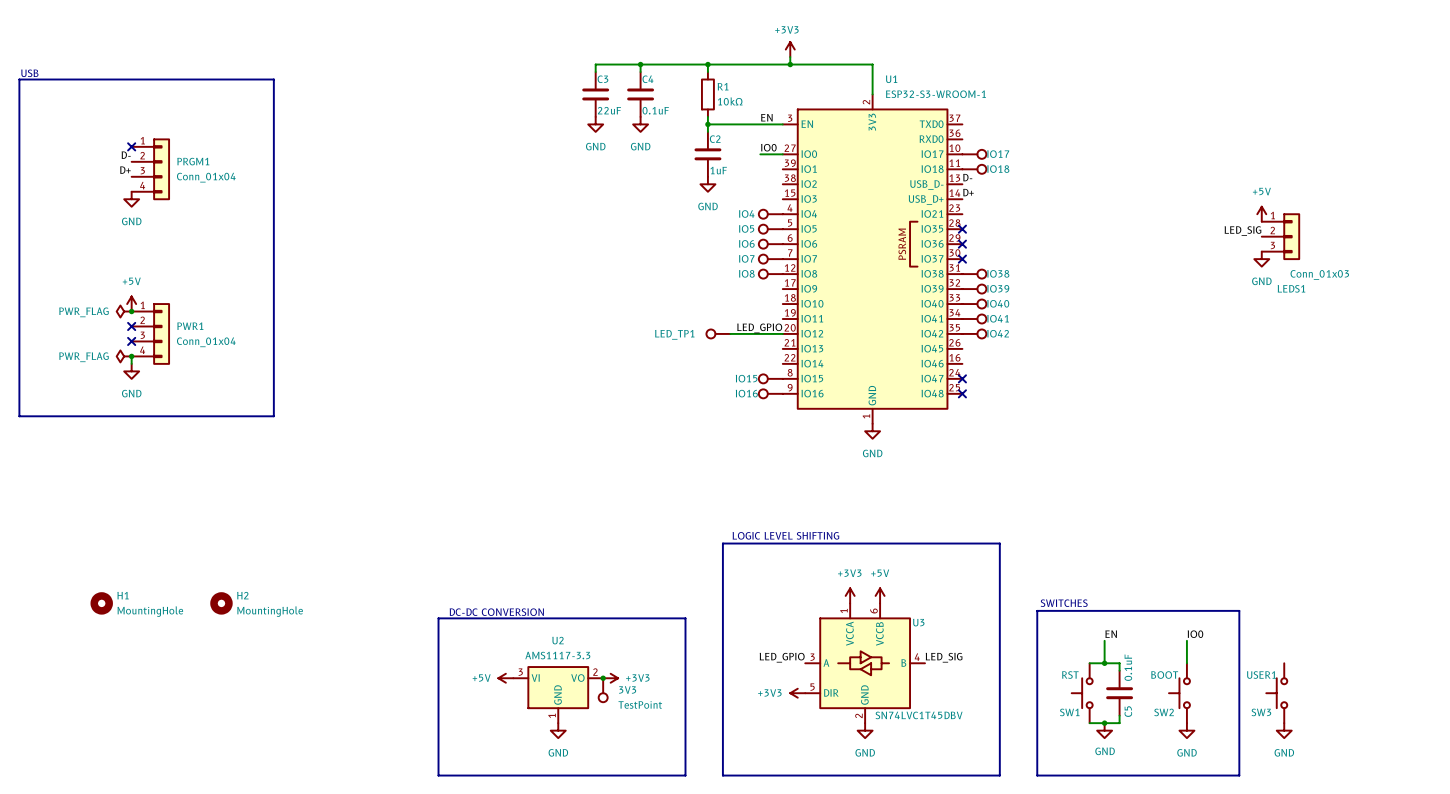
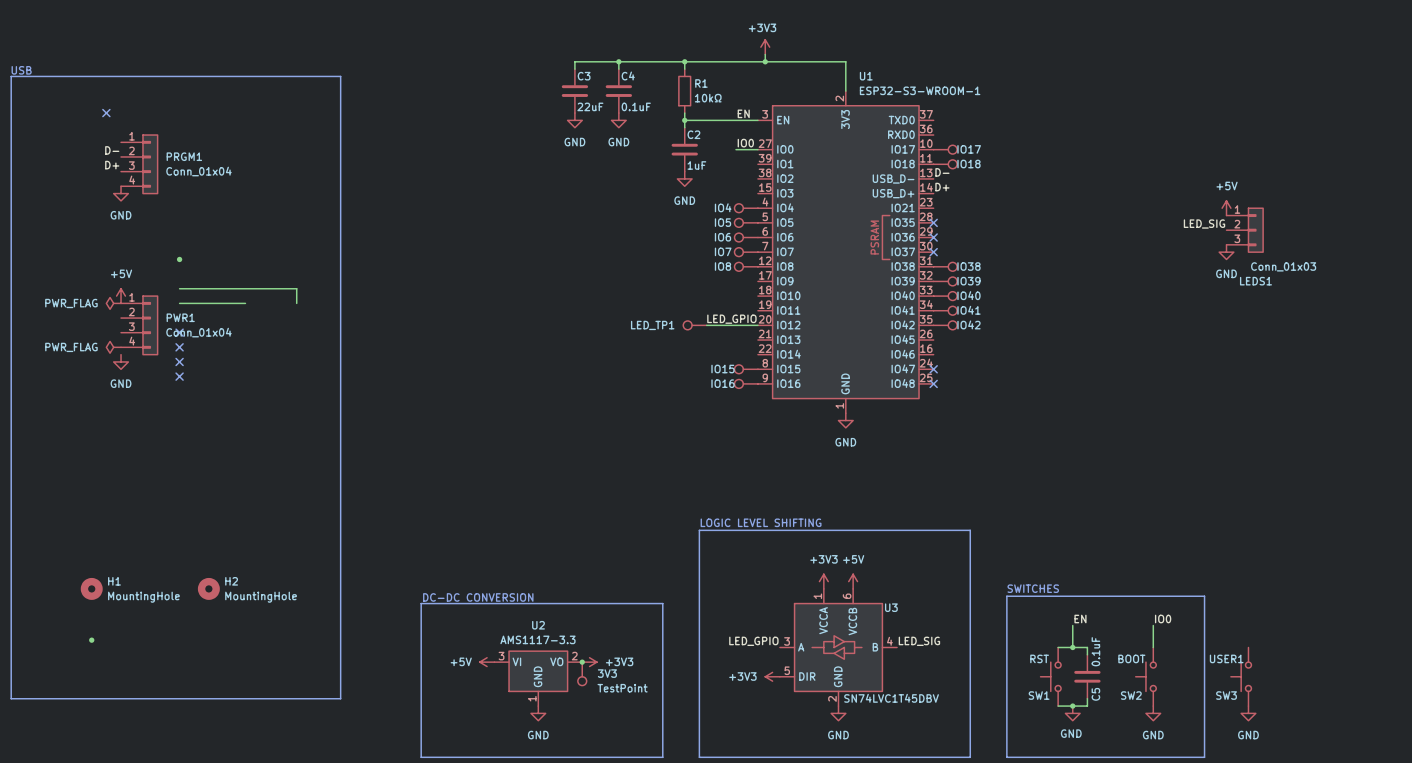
line: (273, 79) (273, 416) (19, 416) -> (260, 76) (340, 76) (340, 698) (11, 698) (11, 405)
no-connect mark position: (131, 146) -> (106, 113)
junction: none -> (179, 259)
wire: none -> (179, 288) (296, 288) (296, 303)
junction: (131, 311) -> none
wire: none -> (179, 303) (245, 303)
no-connect mark: (131, 326) -> none
no-connect mark: (131, 341) -> none
no-connect mark: none -> (179, 332)
wire: (131, 356) (131, 363) -> none
junction: (131, 356) -> none
no-connect mark: none -> (179, 347)
no-connect mark: none -> (179, 361)
no-connect mark: none -> (179, 376)
junction: none -> (91, 640)

